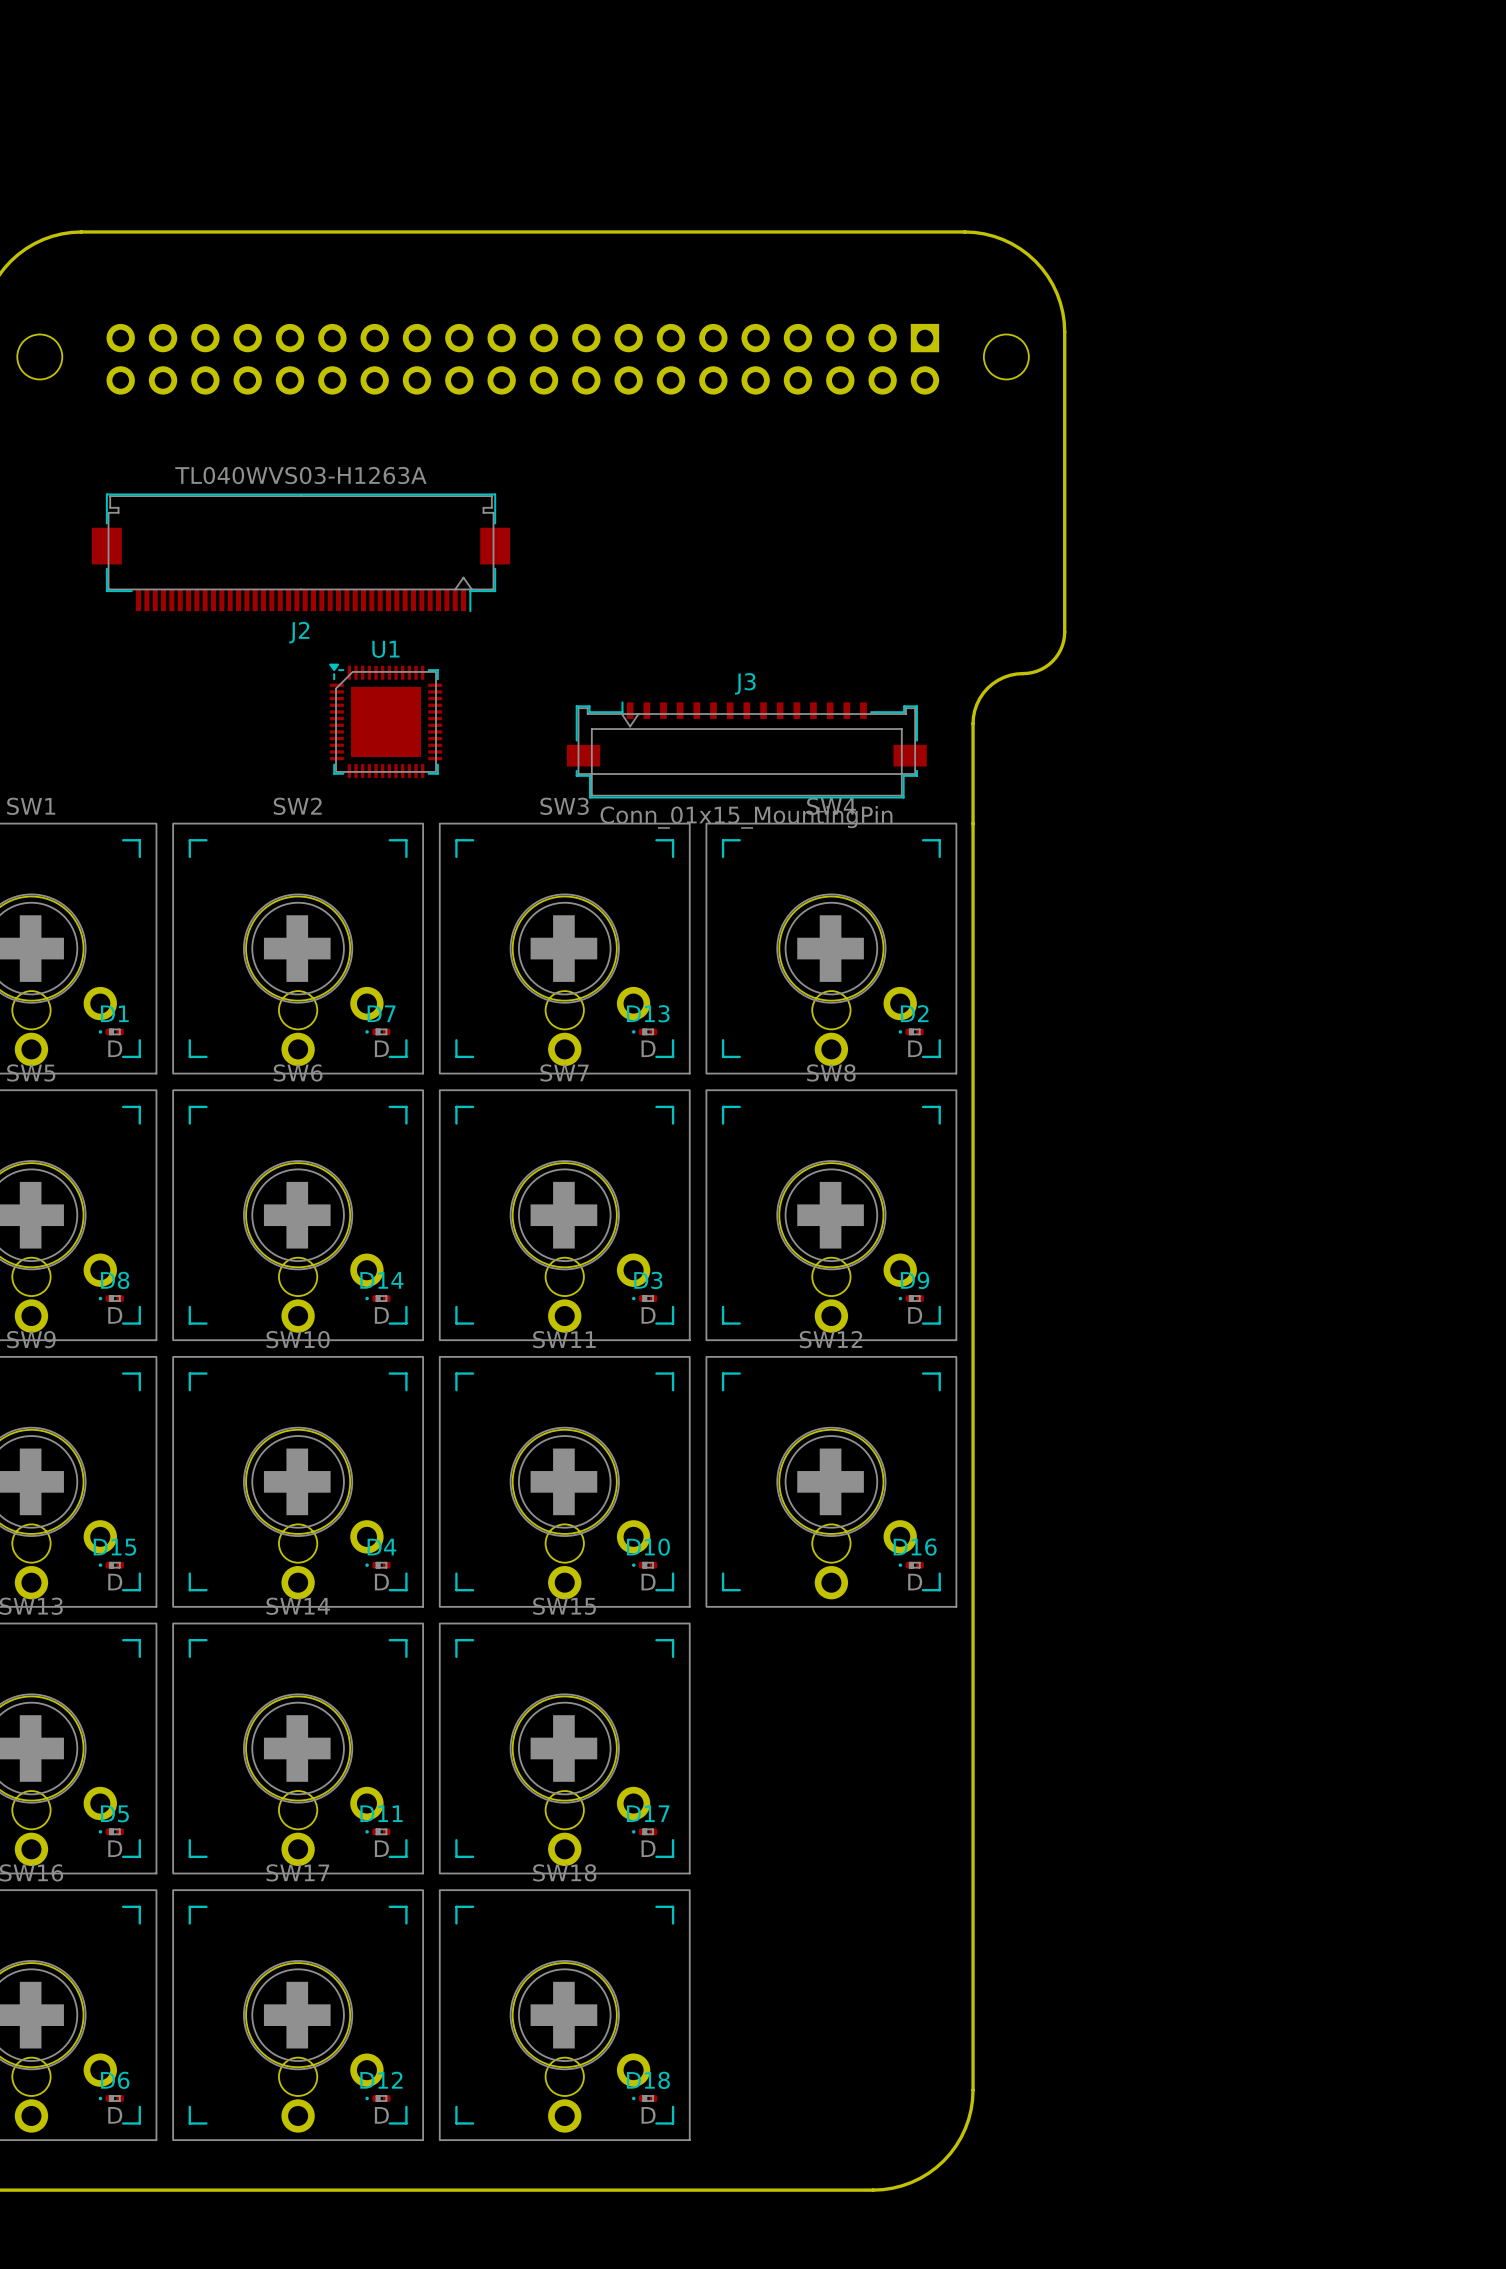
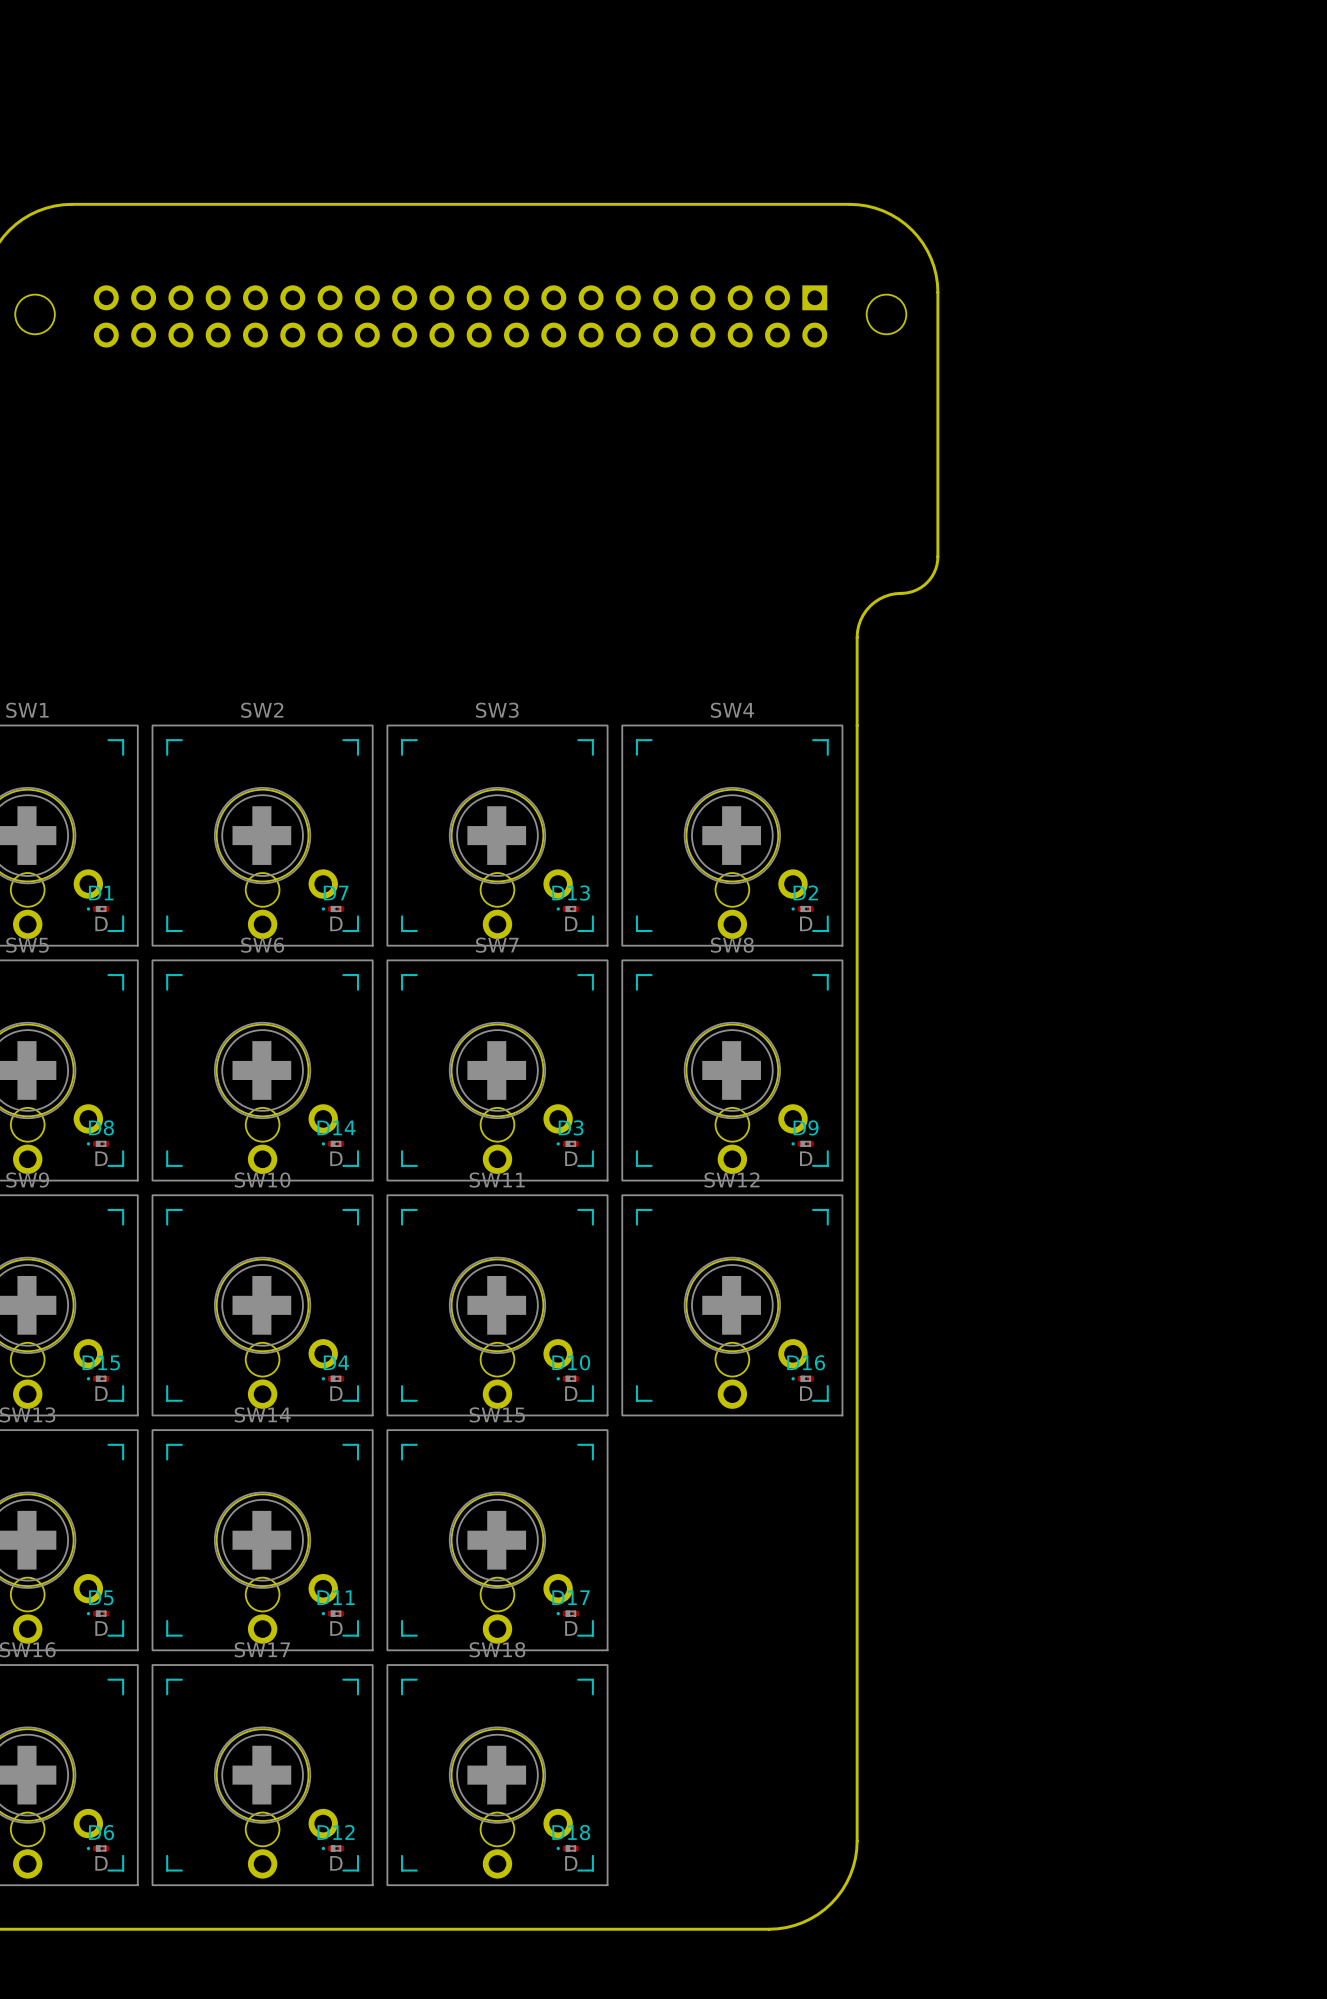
J2: TL040WVS03-H1263A (301, 552) -> none
U1: (385, 720) -> none
J3: Conn_01x15_MountingPin (746, 749) -> none

